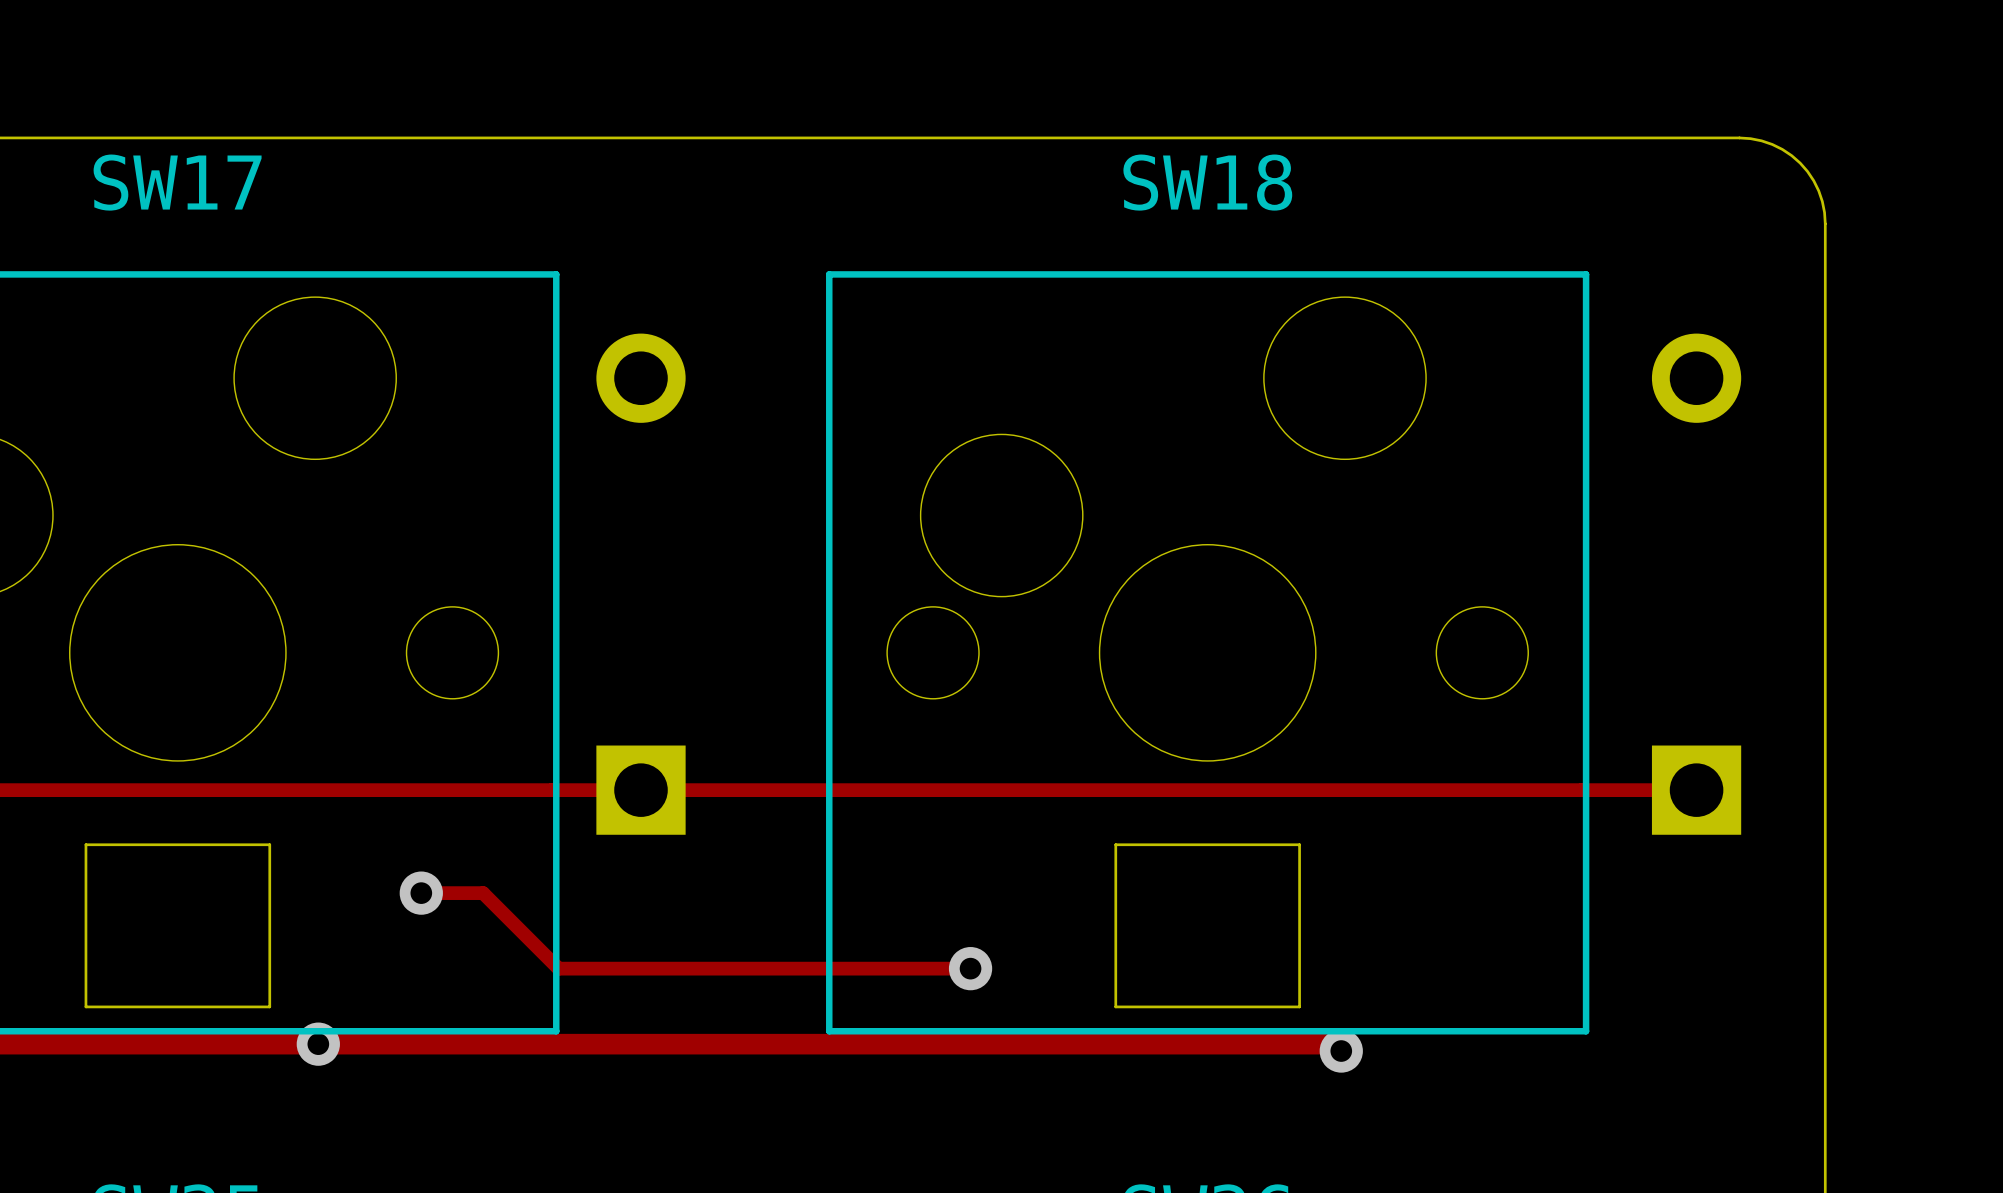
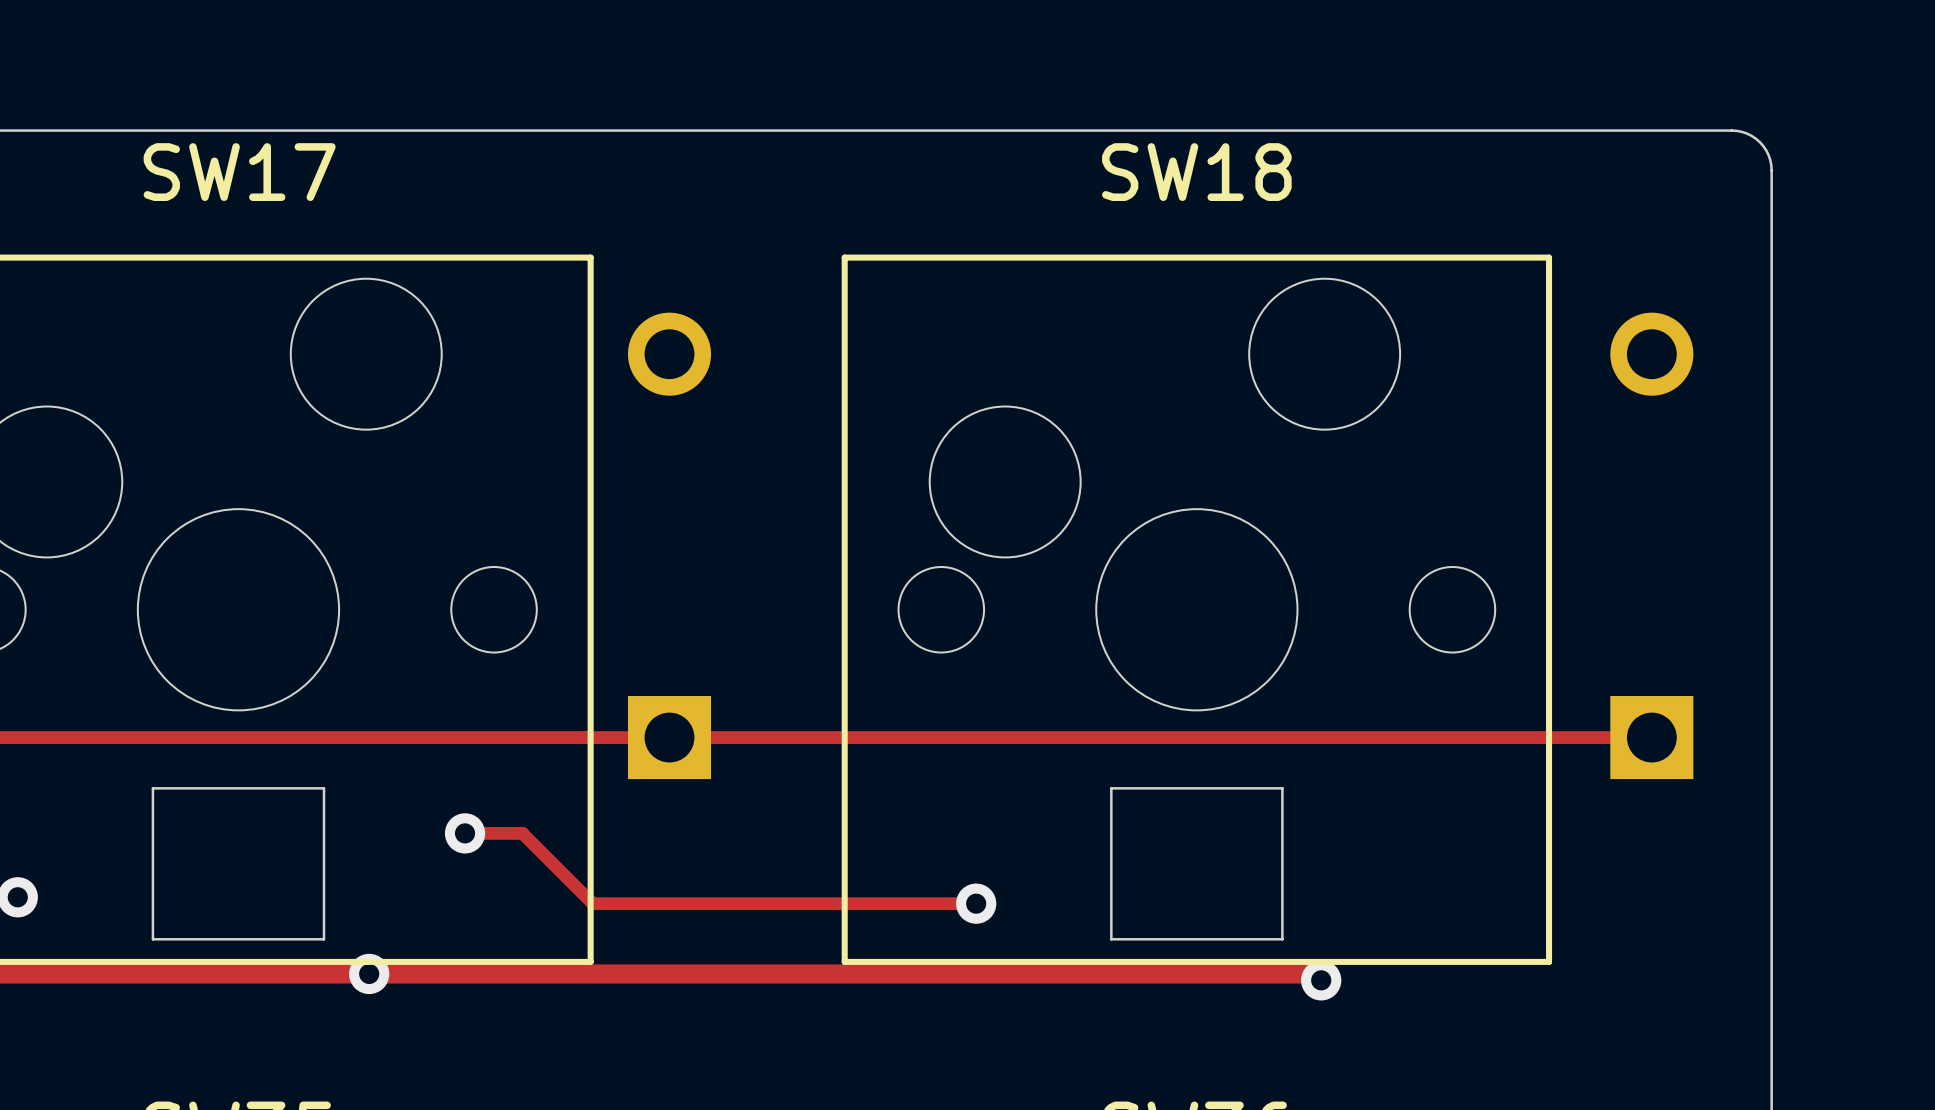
board edge: (1739, 137) (1772, 144) (1800, 163) (1818, 190) (1825, 223) -> (1731, 130) (1751, 135) (1766, 150) (1771, 165) (1771, 210)
board edge: none -> (1691, 130) (1731, 130)

